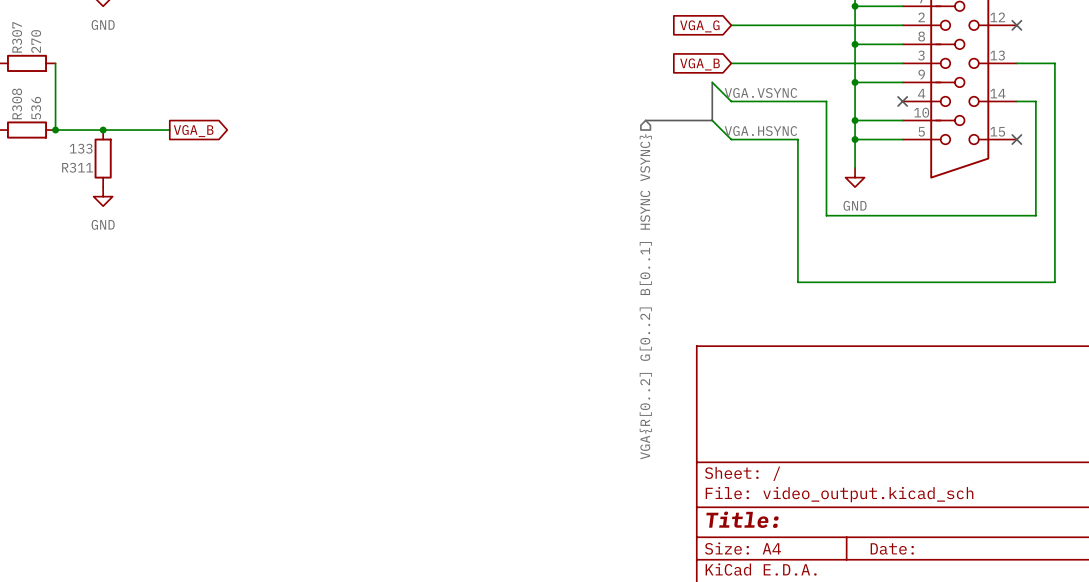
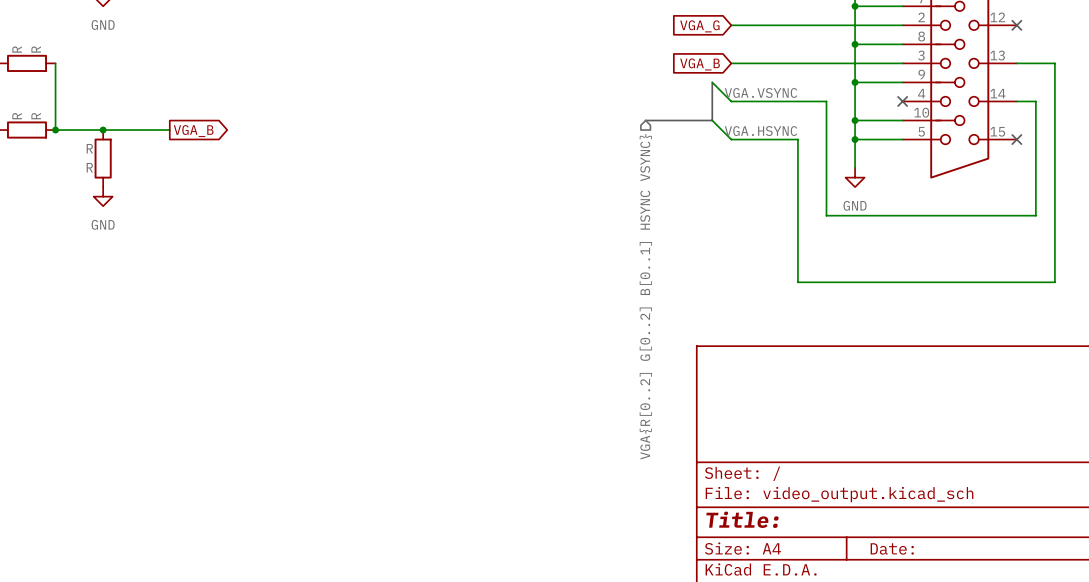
R307 name: R307 (17, 37) -> R (17, 49)
R307 value: 270 (36, 41) -> R (36, 49)
R308 name: R308 (17, 103) -> R (17, 116)
R308 value: 536 (36, 108) -> R (36, 116)
R311 value: 133 (81, 148) -> R (89, 148)
R311 name: R311 (77, 167) -> R (89, 167)

